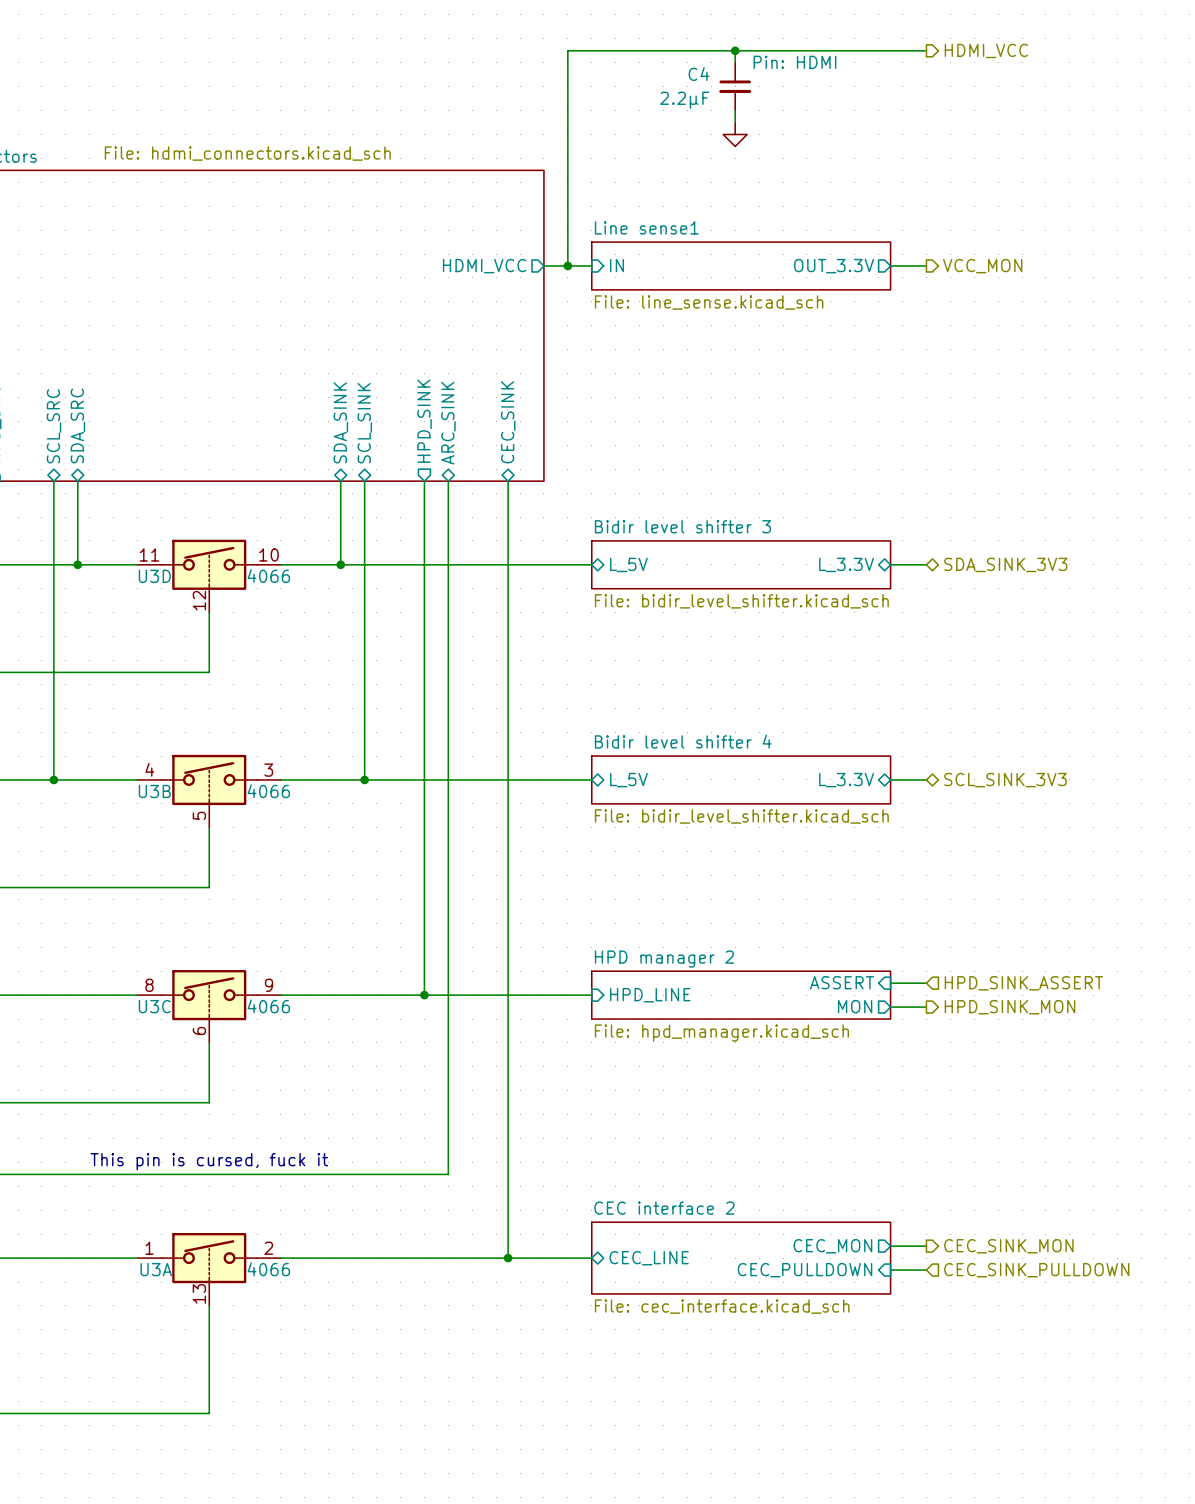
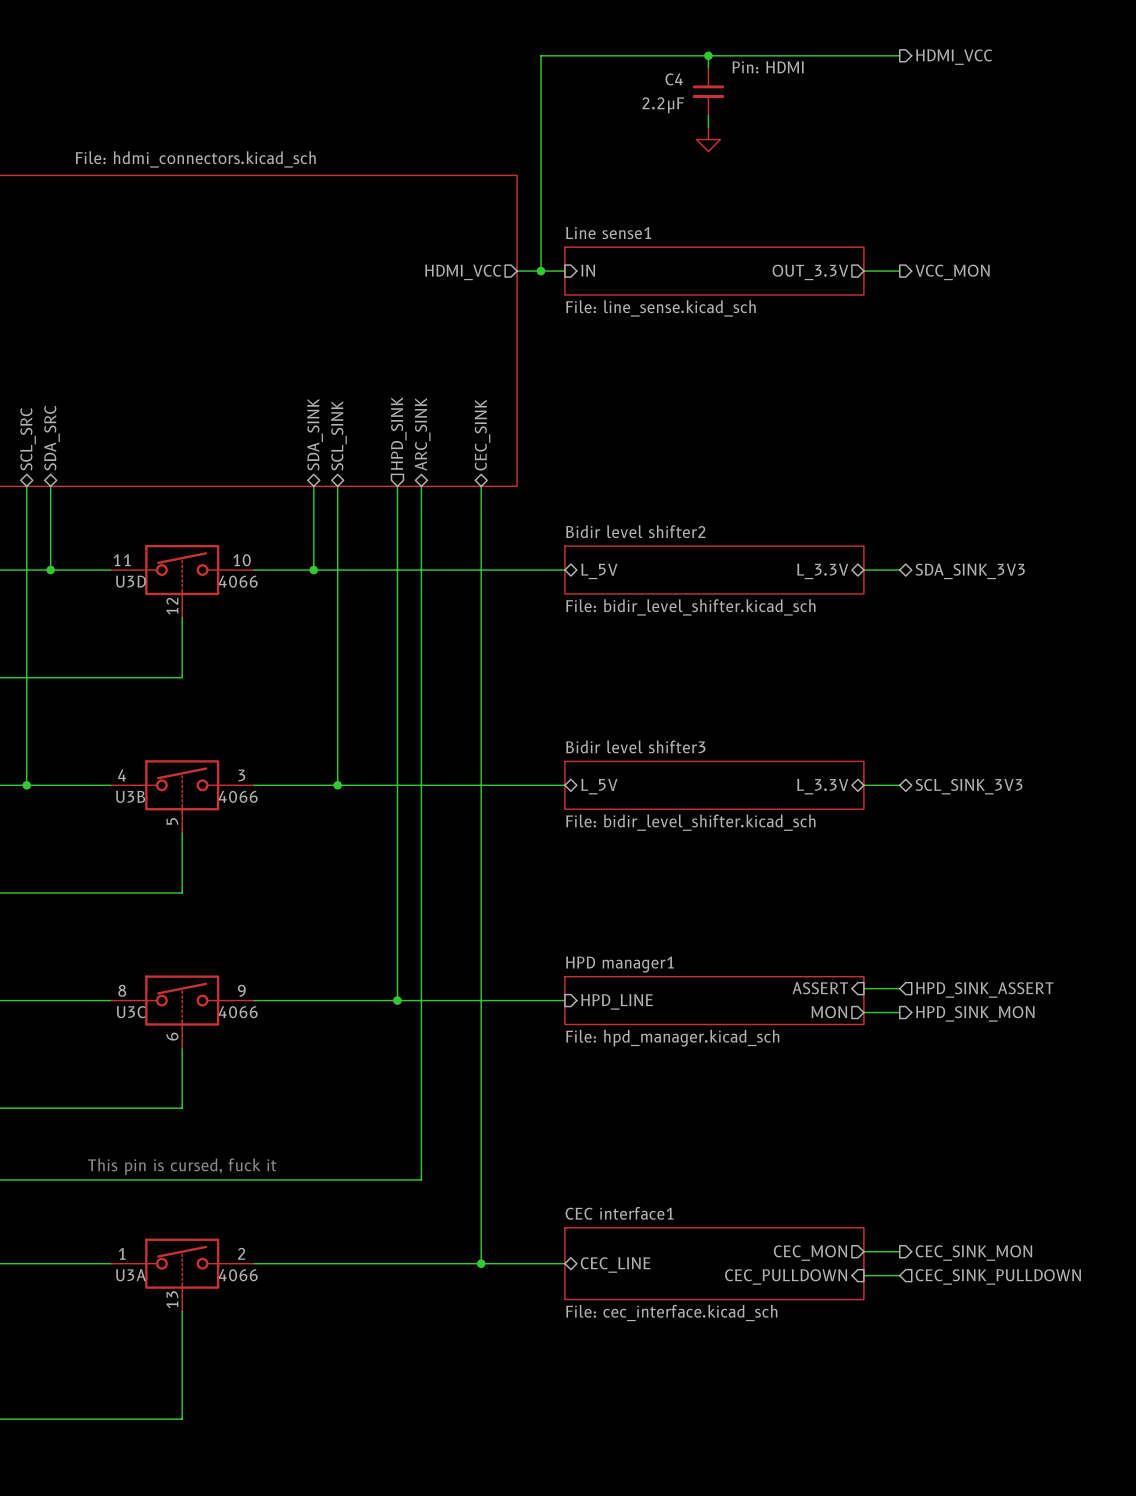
sheet Bidir level shifter 3 name: Bidir level shifter 3 (682, 526) -> Bidir level shifter2 (635, 531)
sheet Bidir level shifter 4 name: Bidir level shifter 4 (683, 741) -> Bidir level shifter3 (635, 746)
sheet HPD manager 2 name: HPD manager 2 (664, 959) -> HPD manager1 (619, 964)
sheet CEC interface 2 name: CEC interface 2 (664, 1208) -> CEC interface1 (619, 1213)

